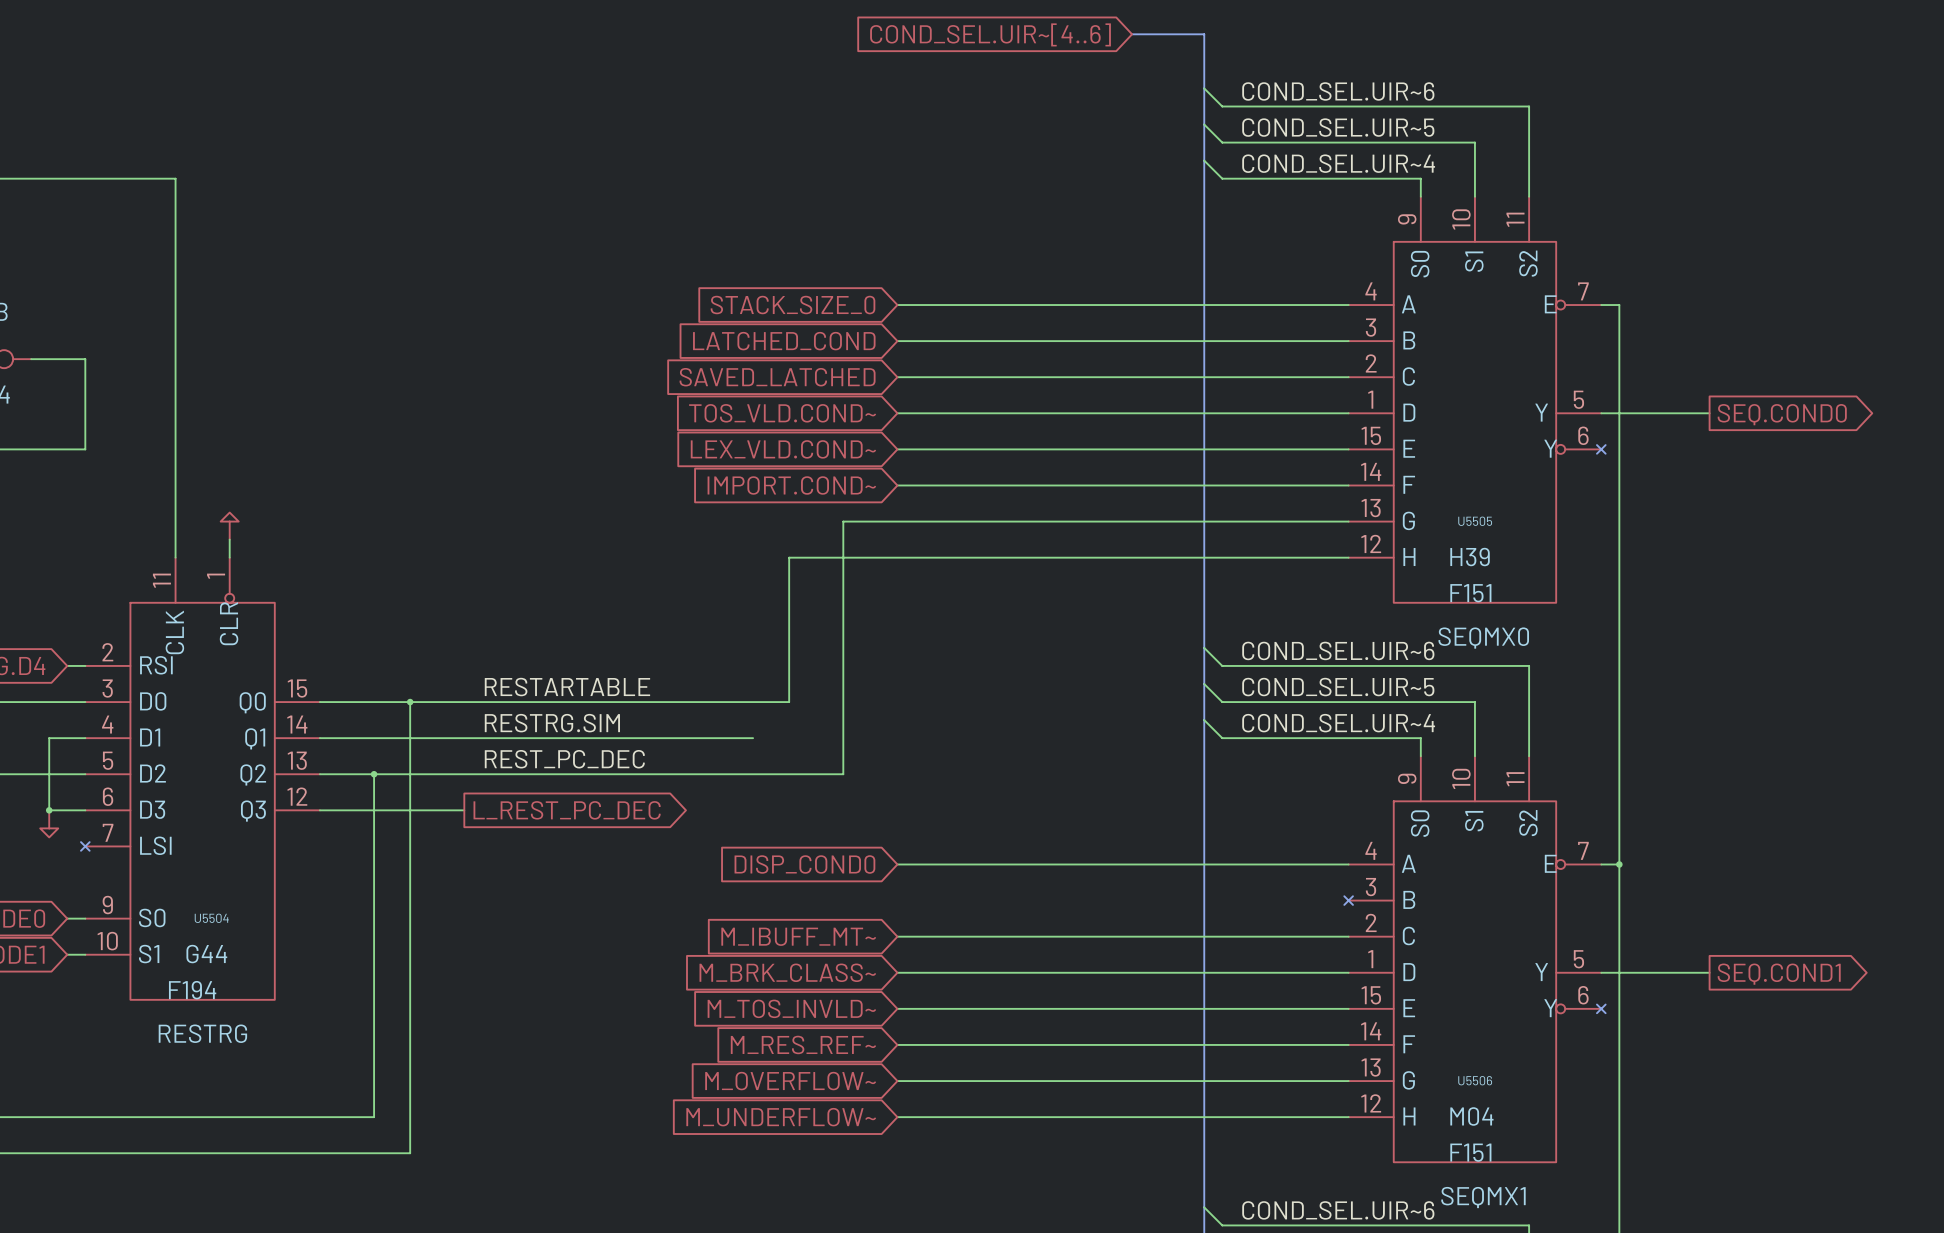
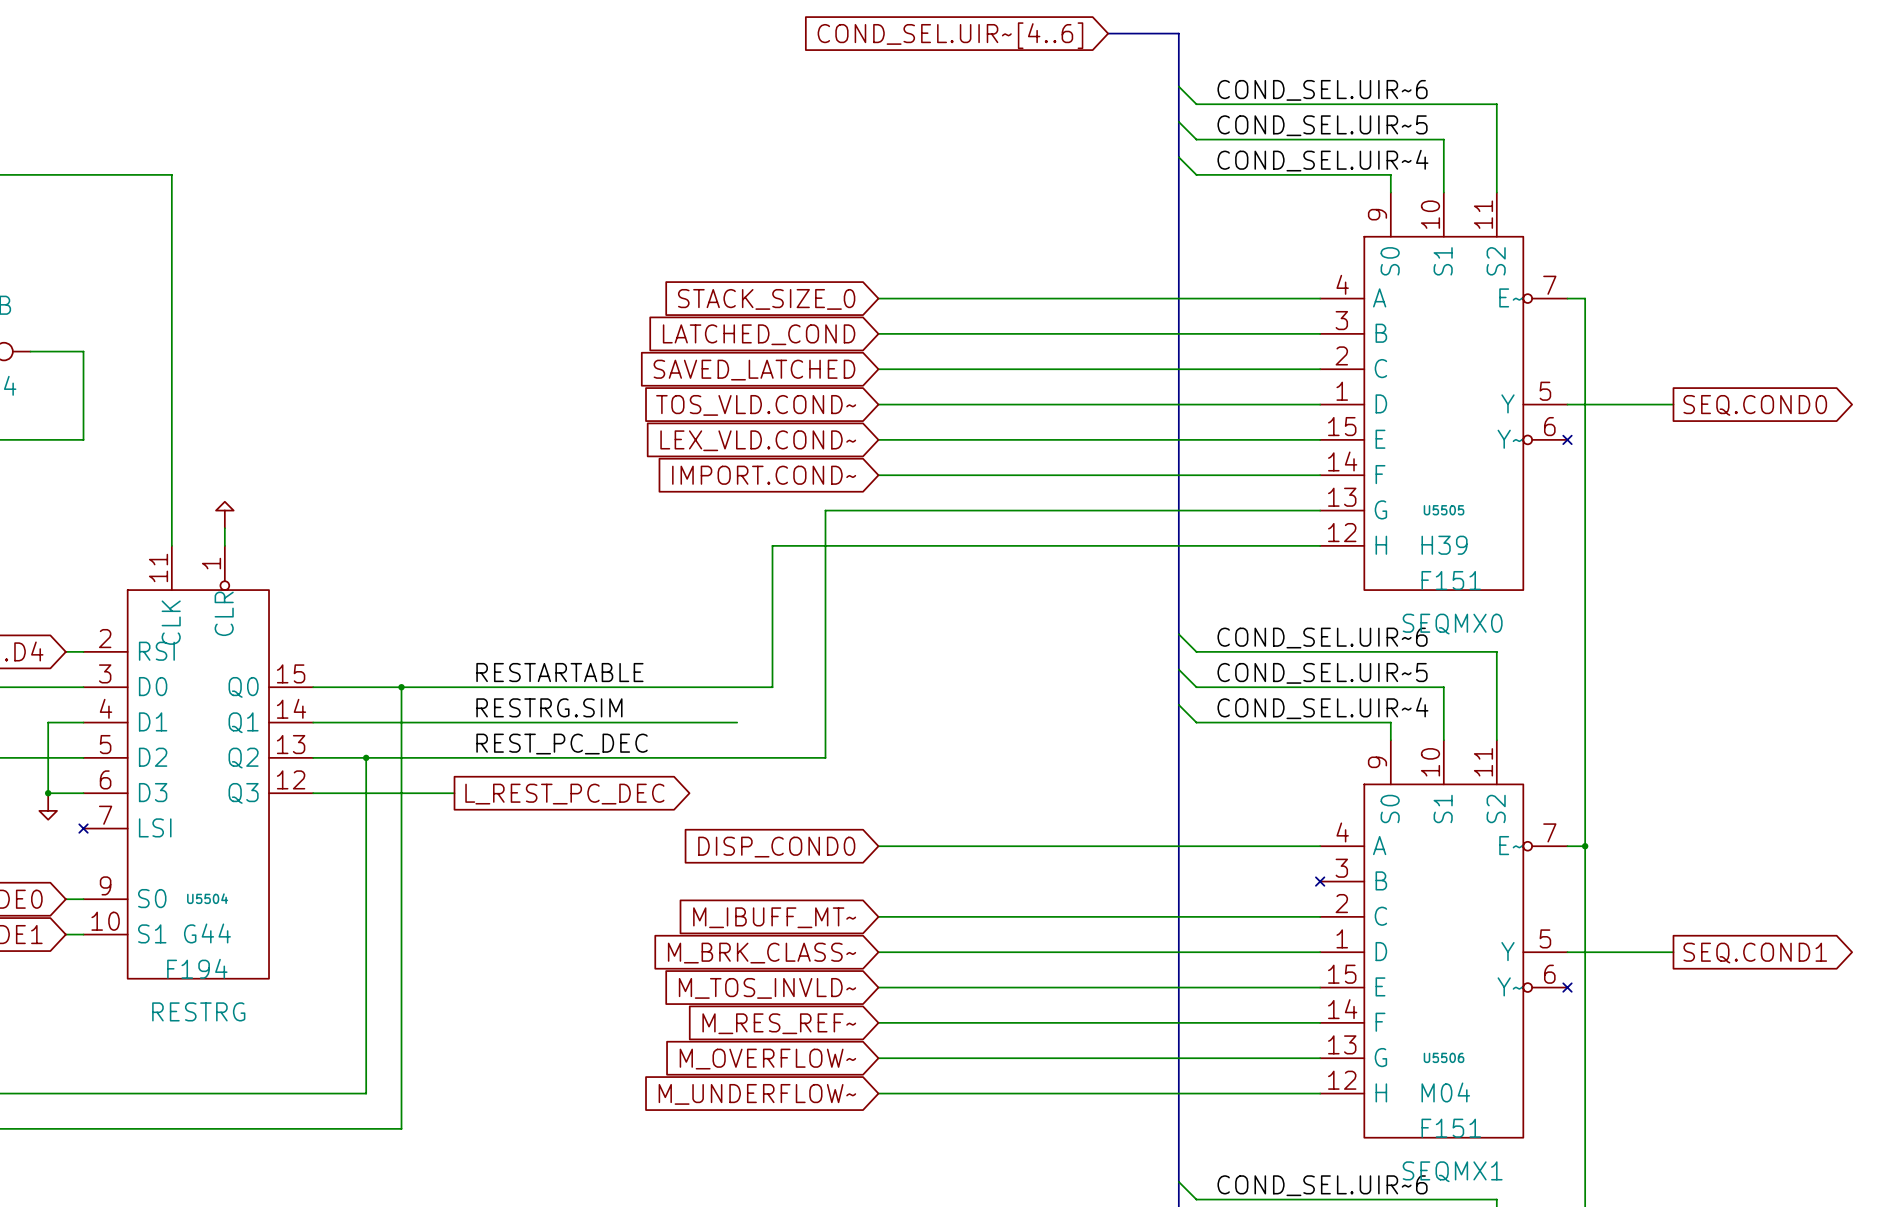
U5505 pin name: E (1550, 304) -> E~ (1510, 297)
U5505 pin name: Y (1550, 448) -> Y~ (1510, 439)
U5506 pin name: E (1550, 863) -> E~ (1510, 845)
U5506 pin name: Y (1550, 1008) -> Y~ (1510, 986)

